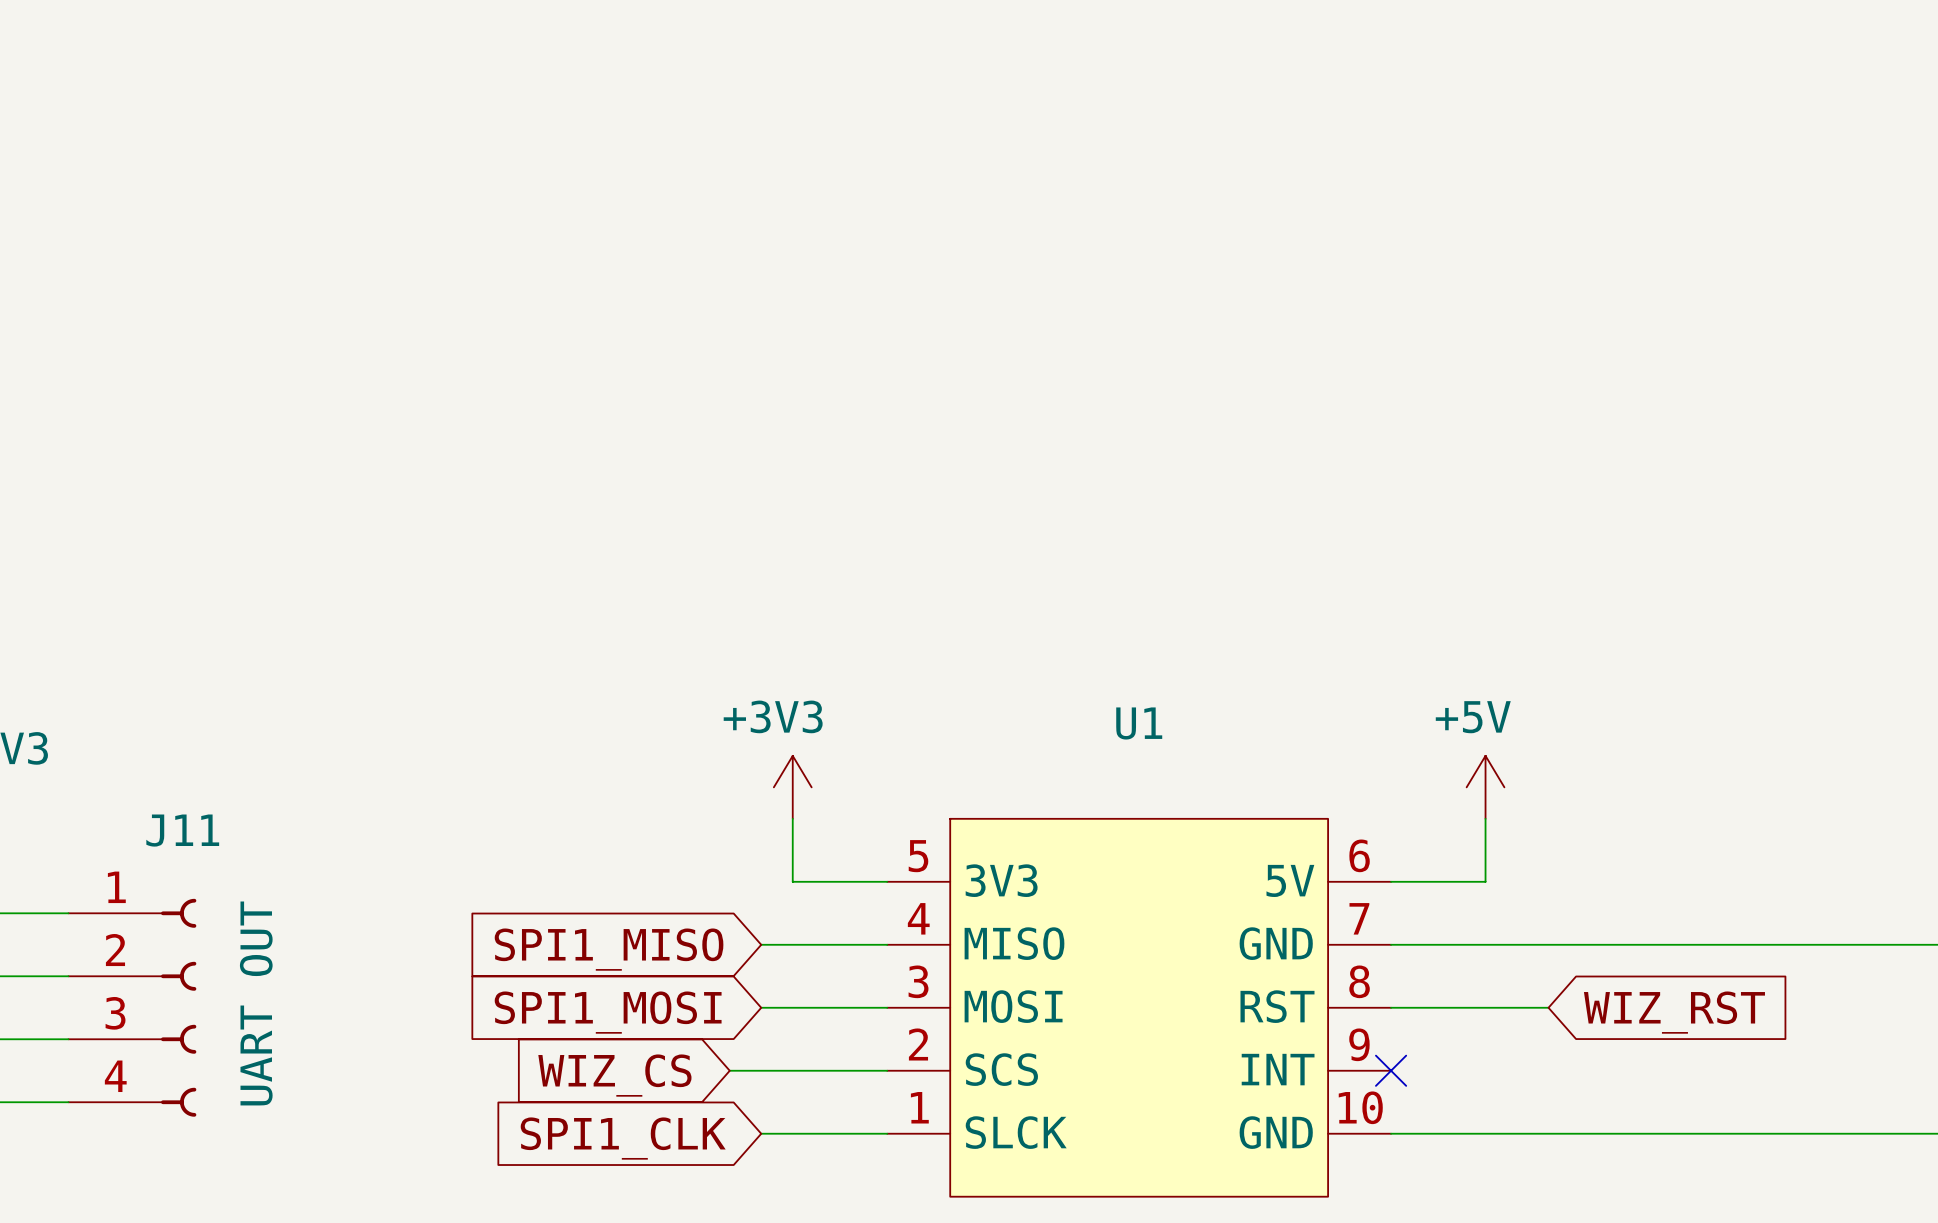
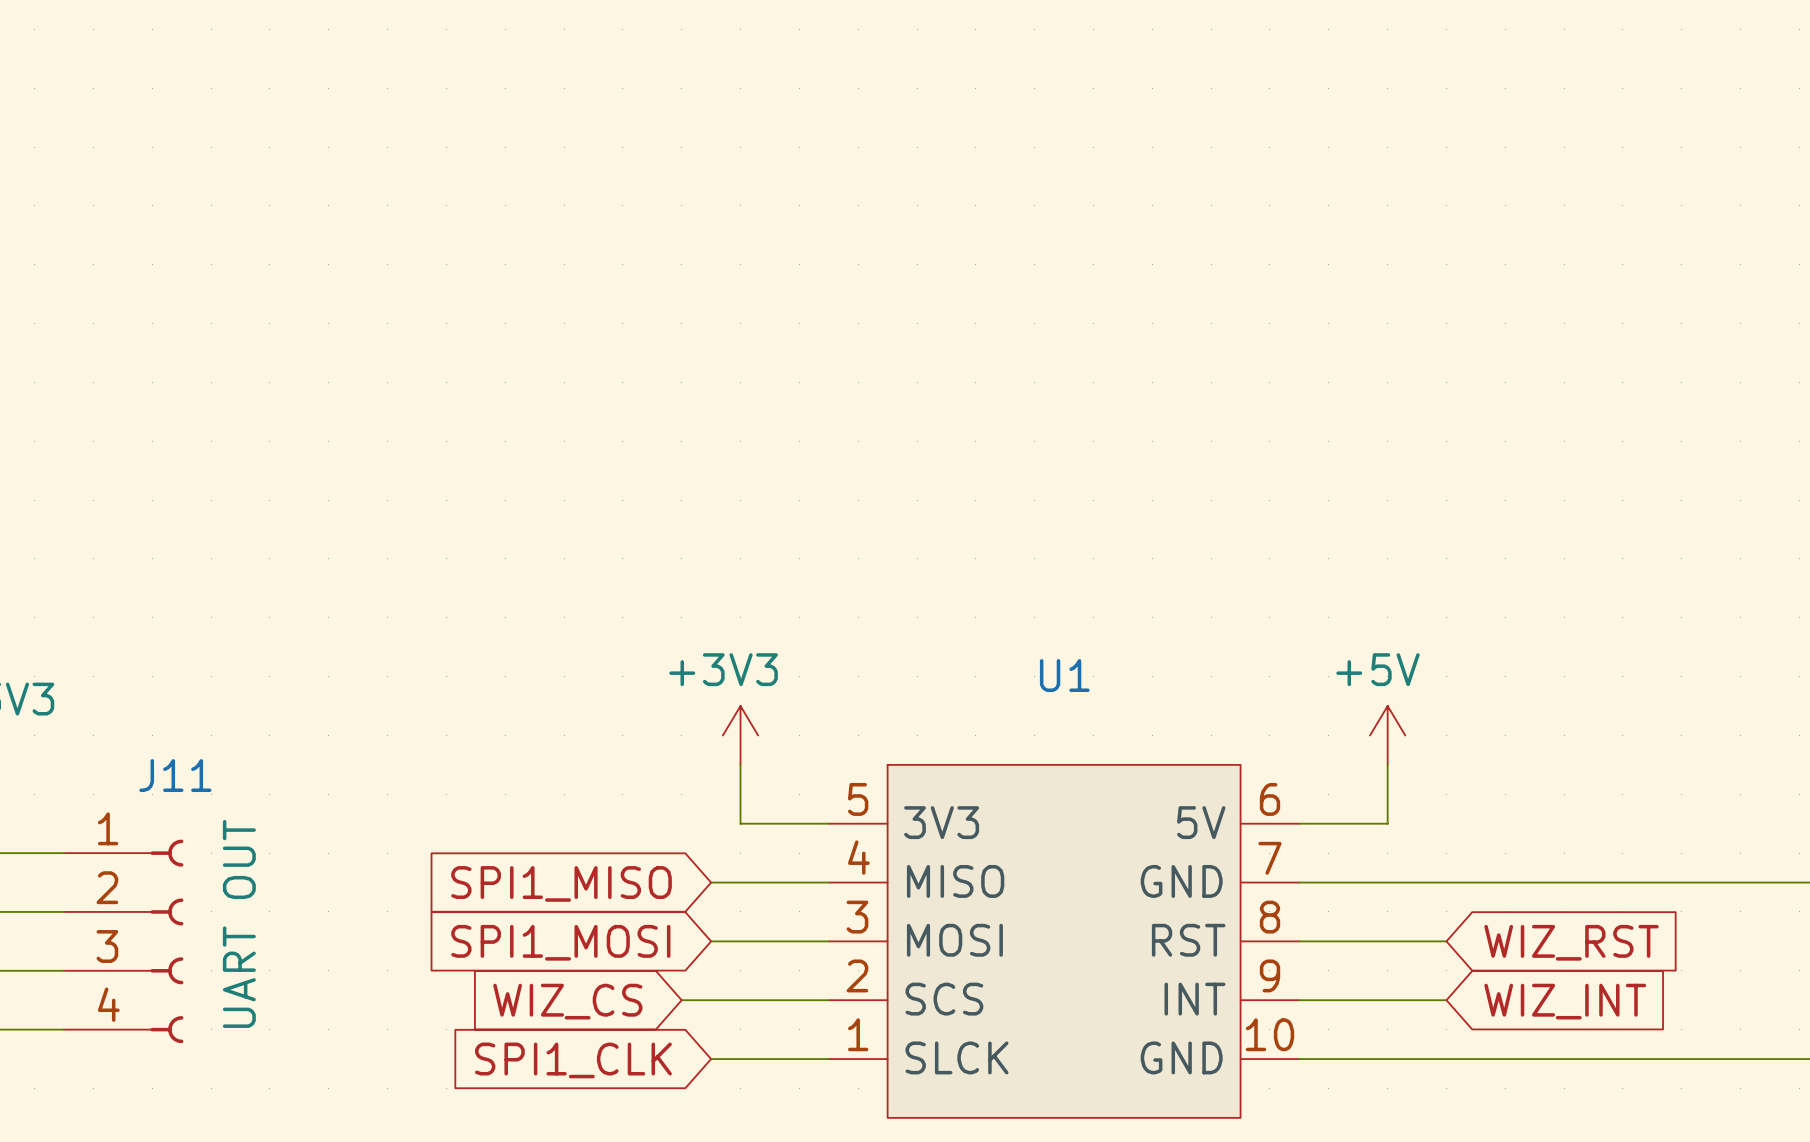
wire: none -> (1299, 1000) (1446, 1000)
no-connect mark: (1391, 1070) -> none
global label: none -> WIZ_INT (1565, 1001)

